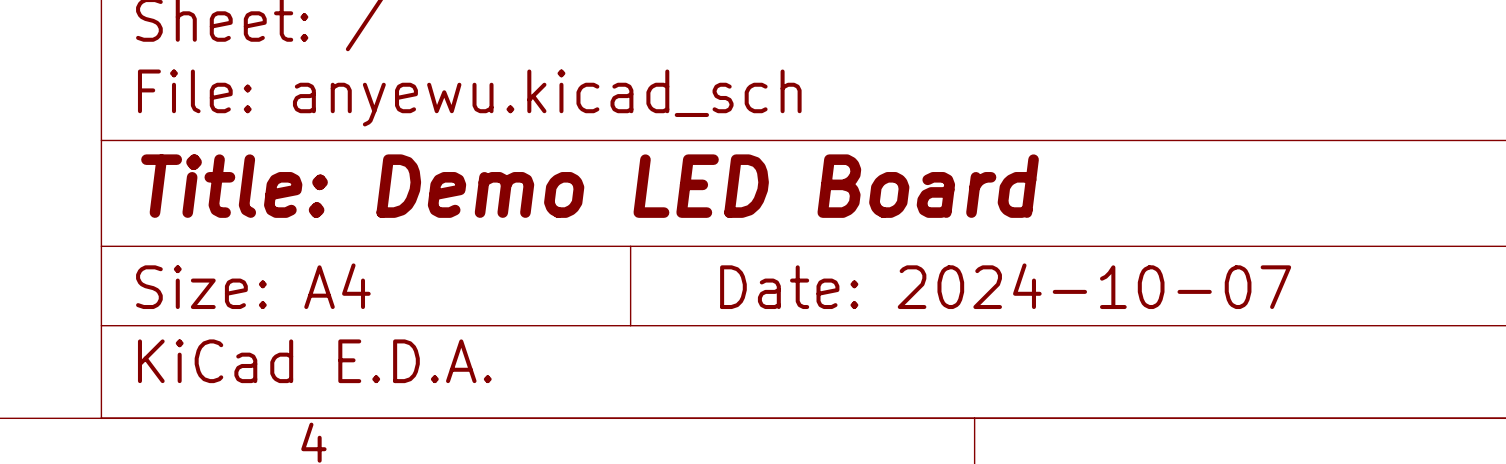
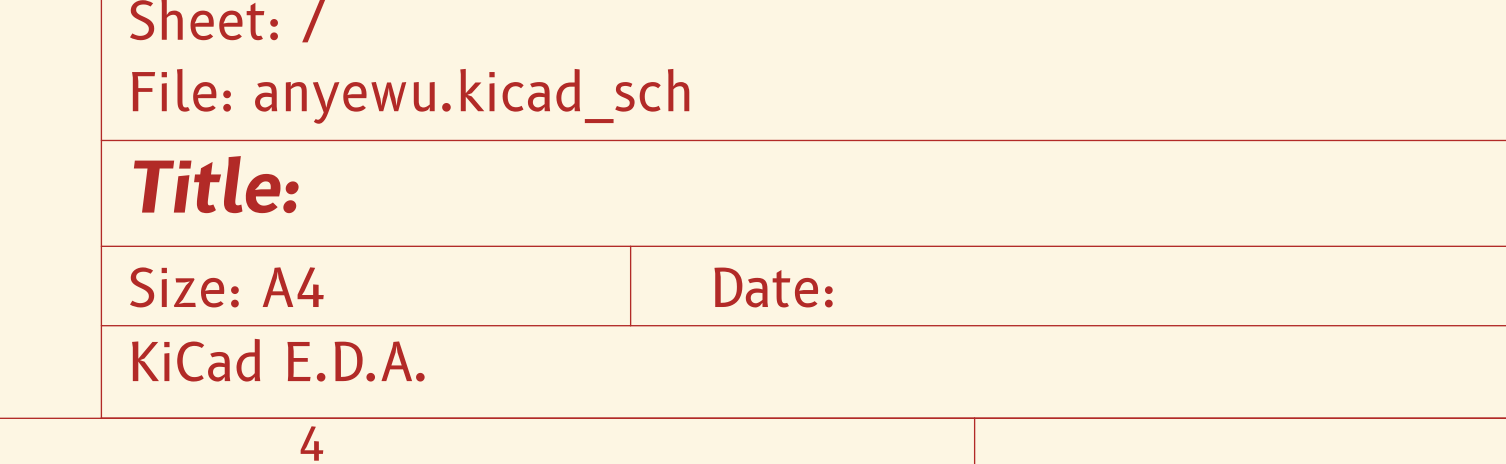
title block: Title: Demo LED Board (590, 186) -> Title: (216, 184)
title block: Date: 2024-10-07 (1005, 286) -> Date: (773, 287)

